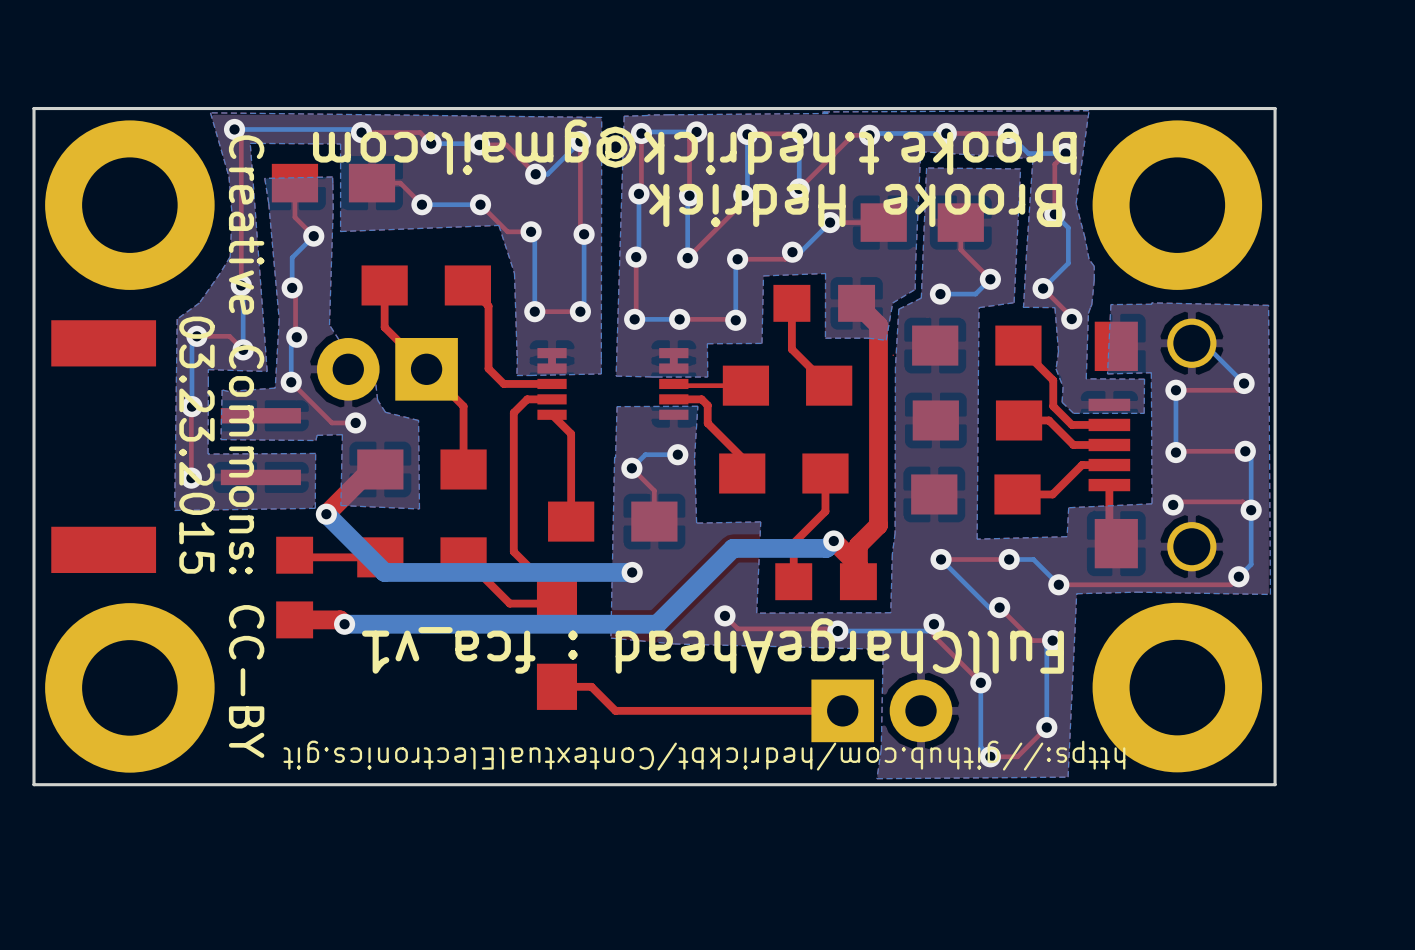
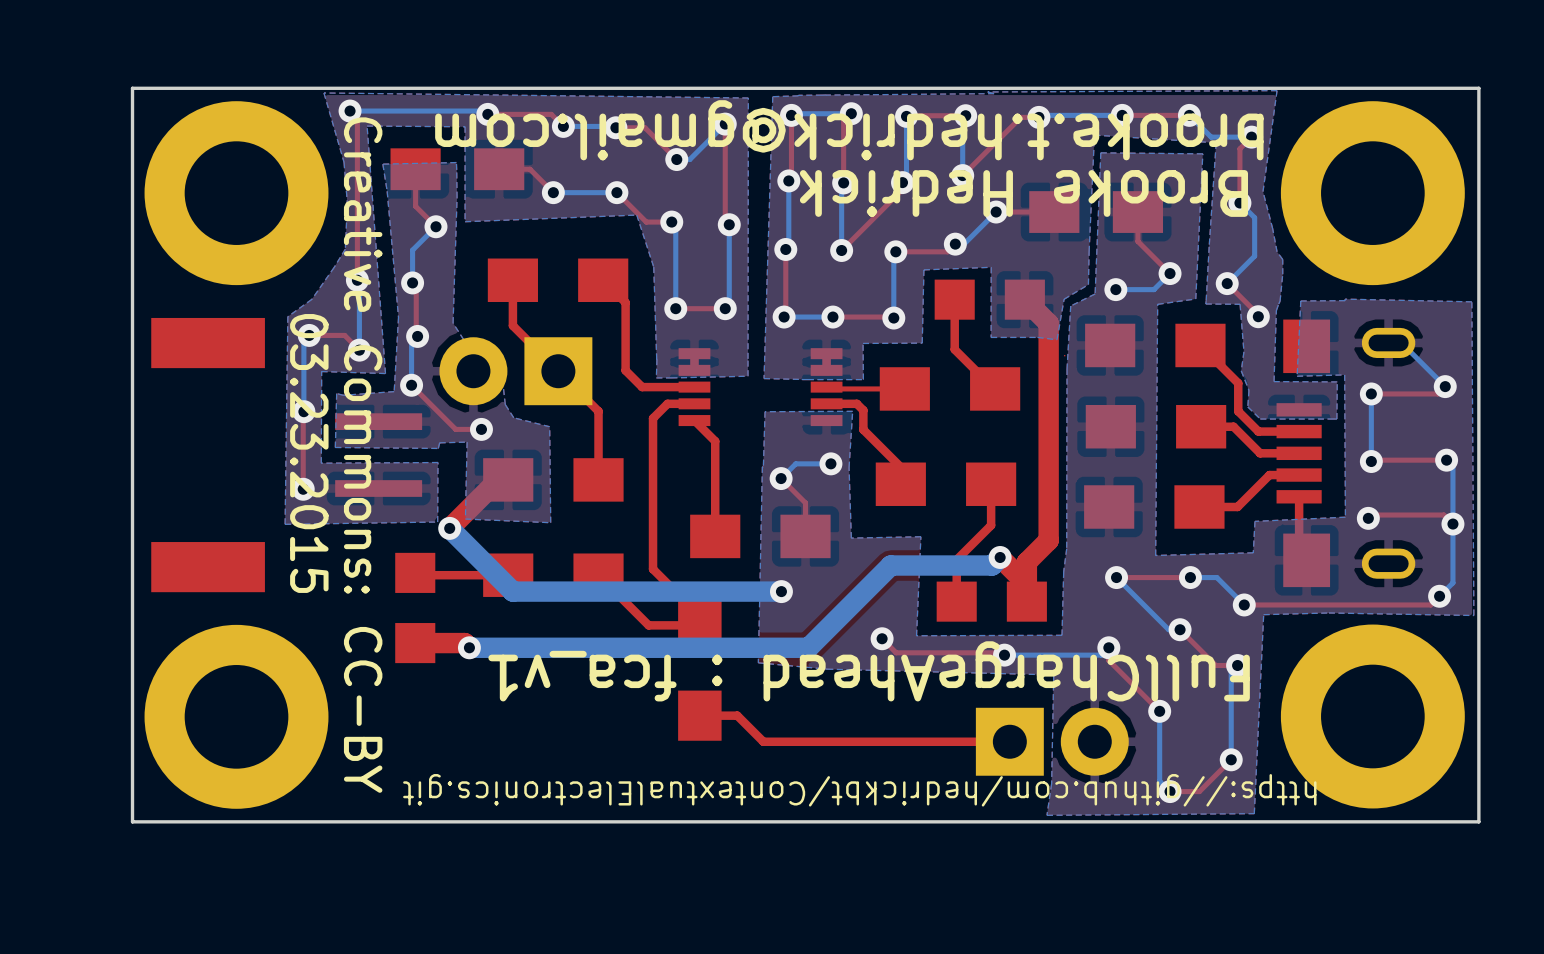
part footprint: [1088, 318, 1217, 572] -> [1276, 319, 1416, 588]

